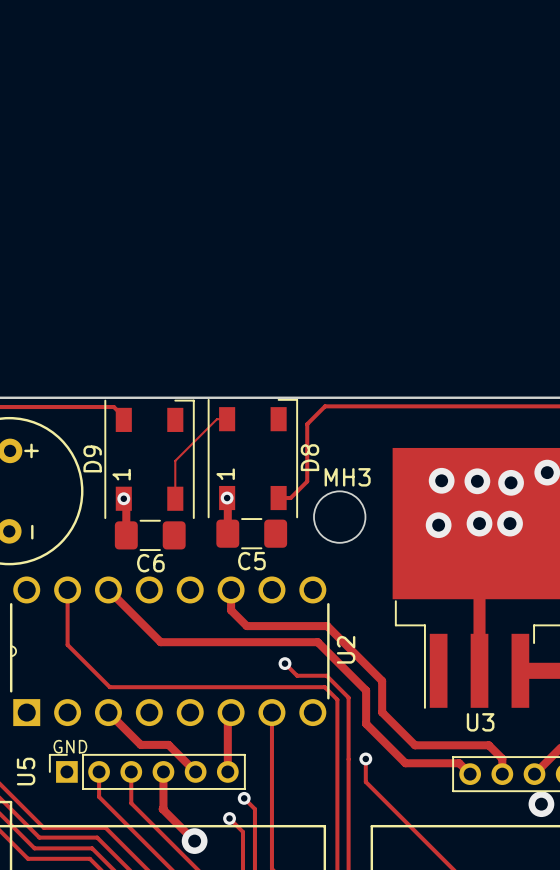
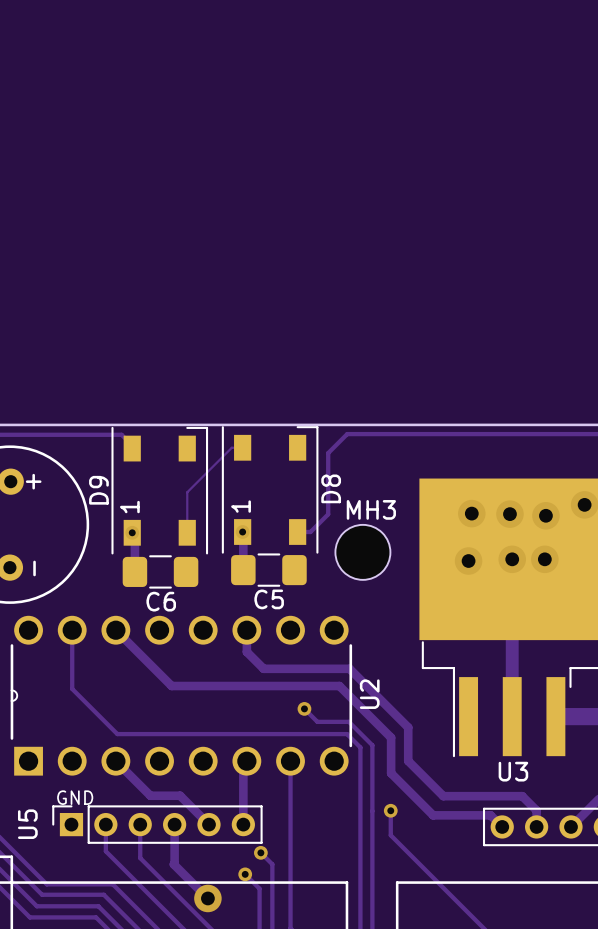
via: (541, 804) -> none

